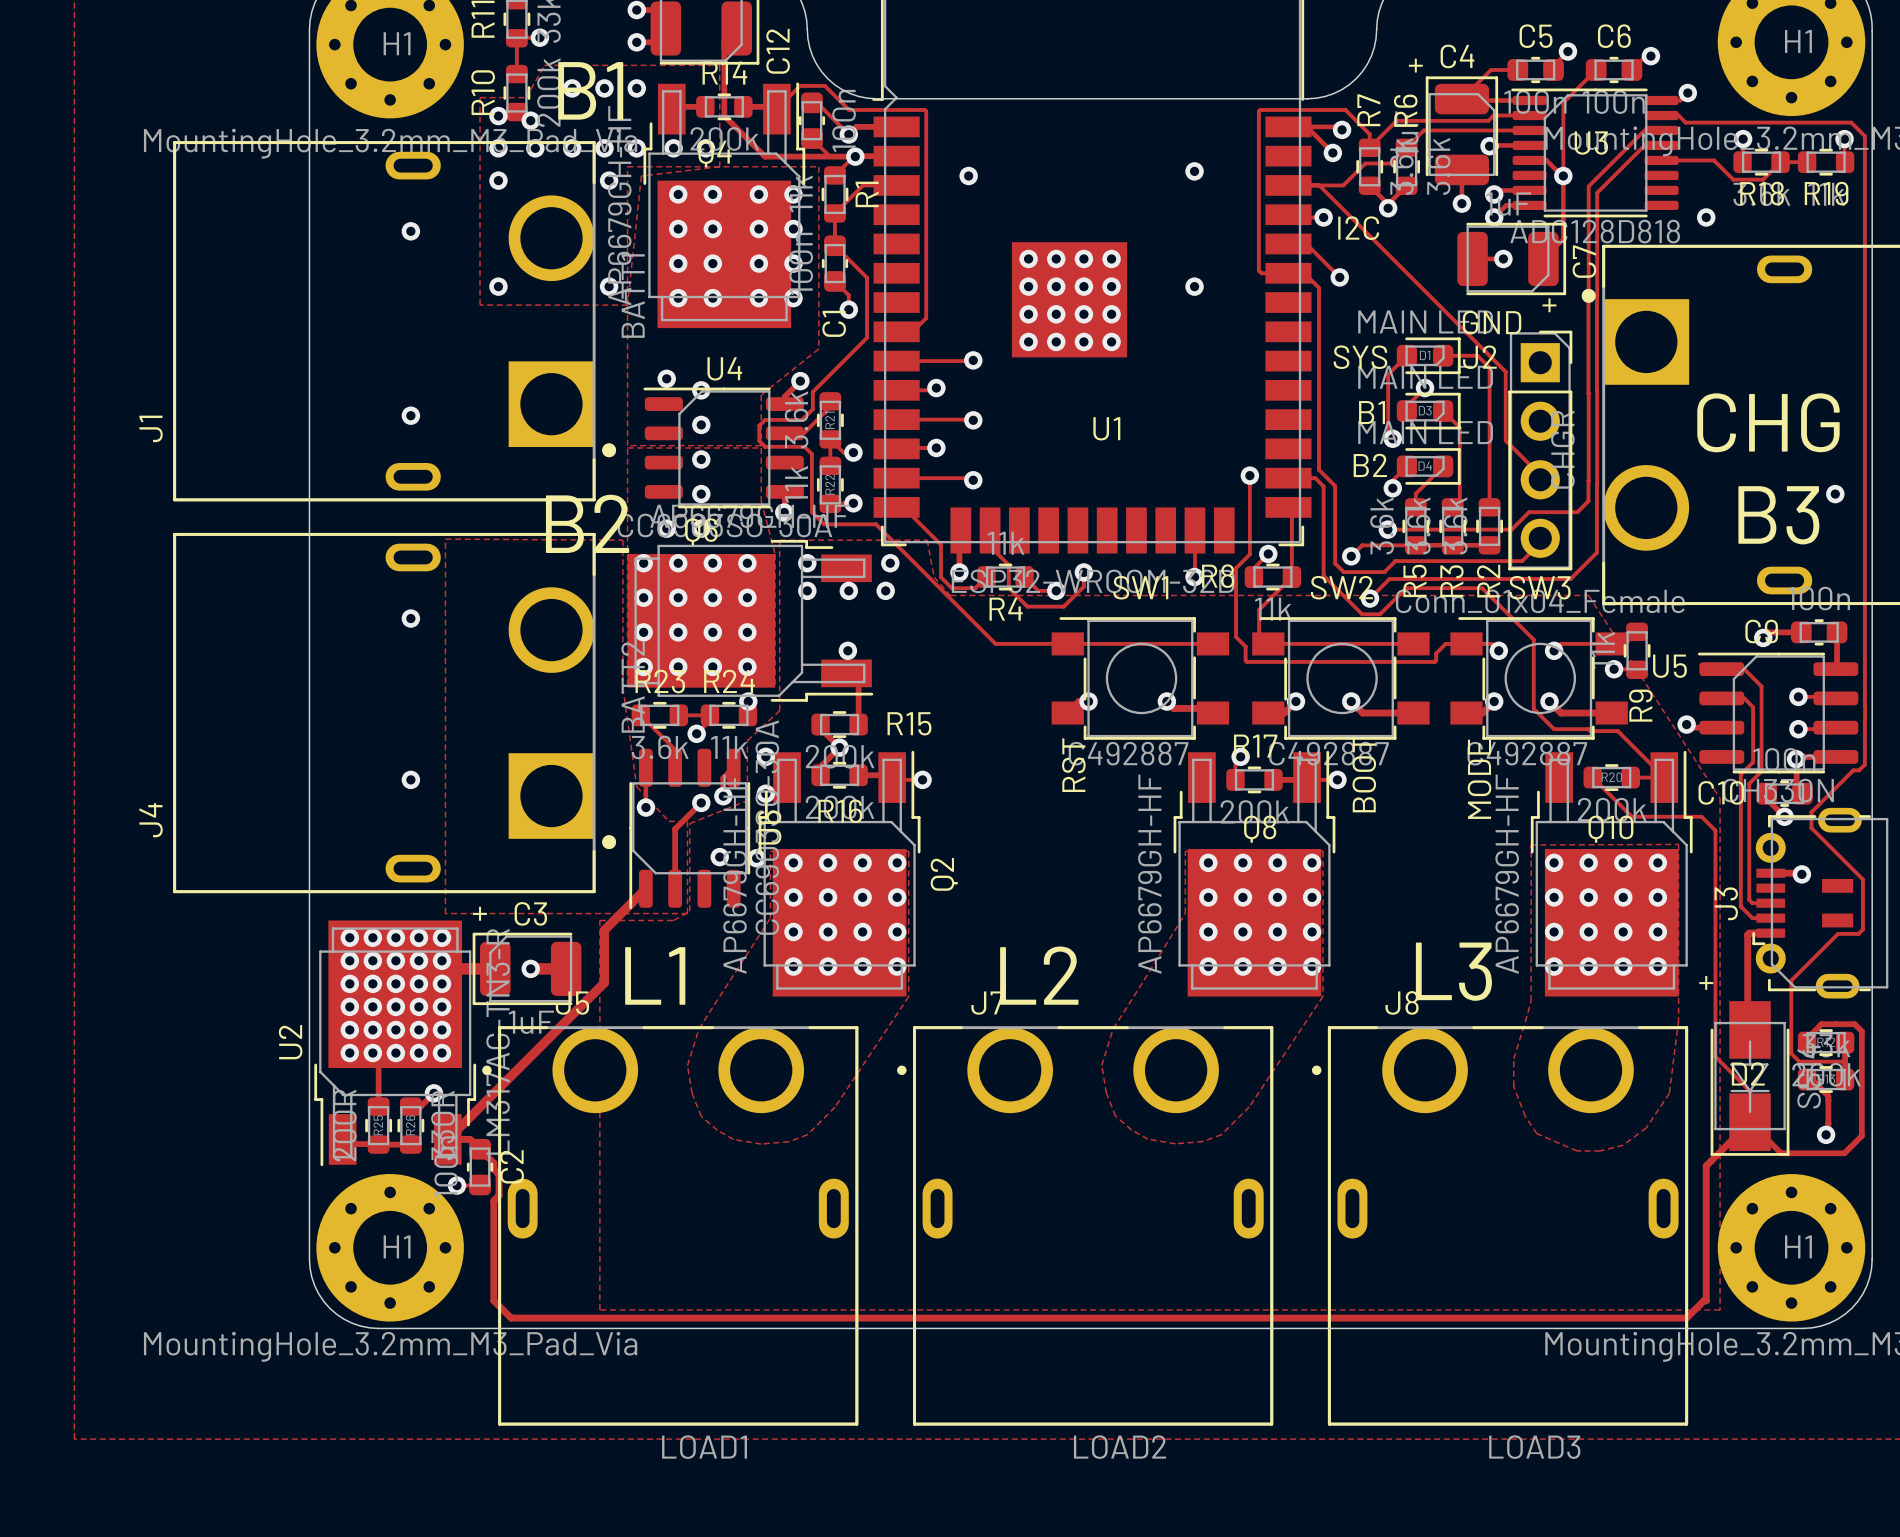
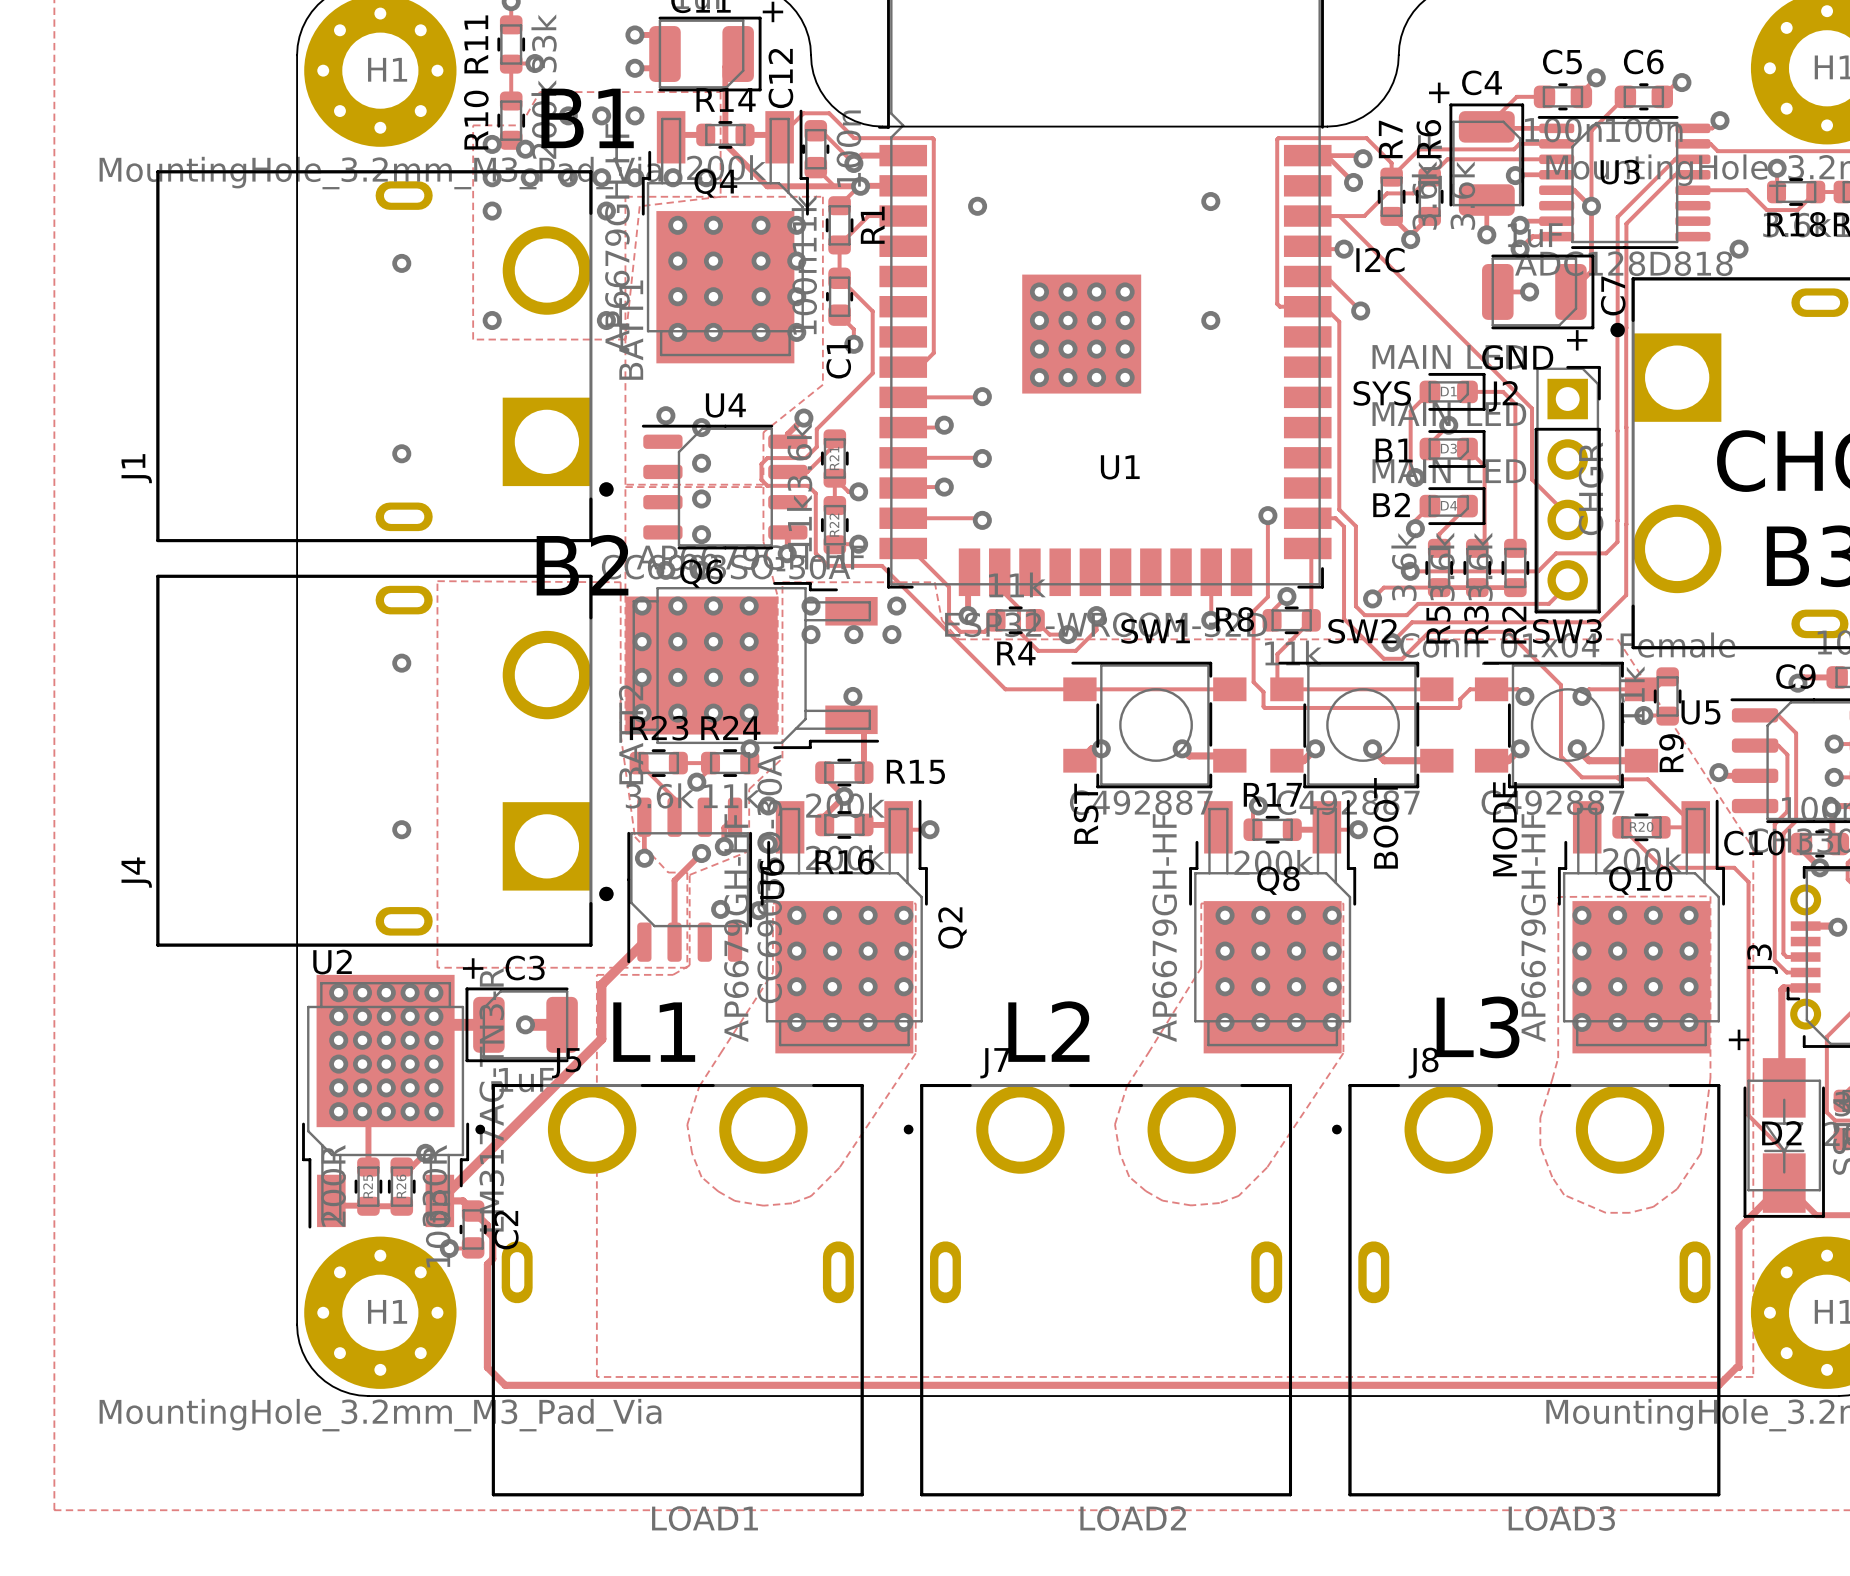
U2 name rotation: 0° (290, 1042) -> 90° clockwise (332, 962)
U2 name position: U2 (290, 1042) -> U2 (332, 962)

